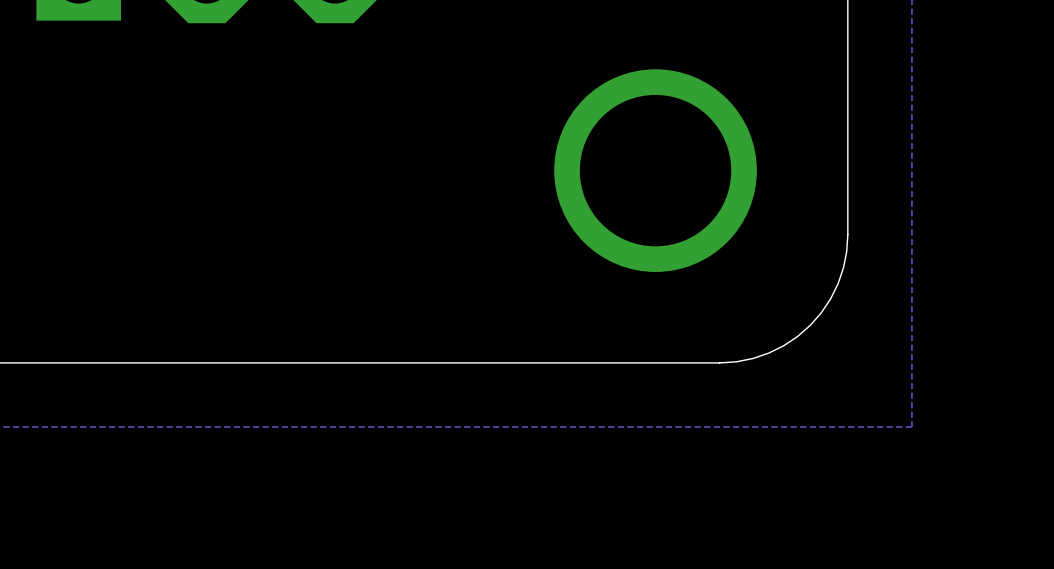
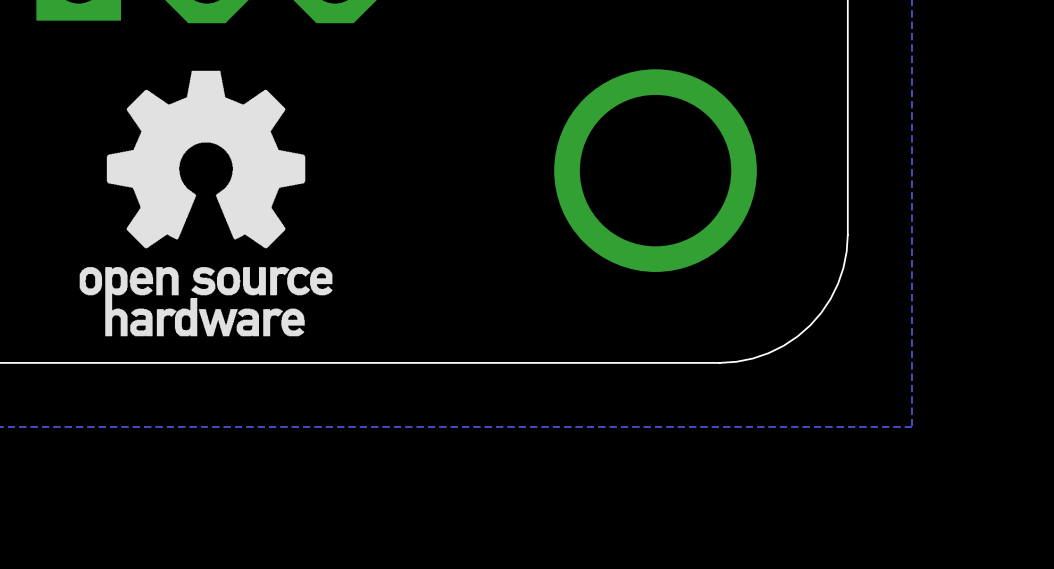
drawing: none -> [79, 70, 333, 337]

